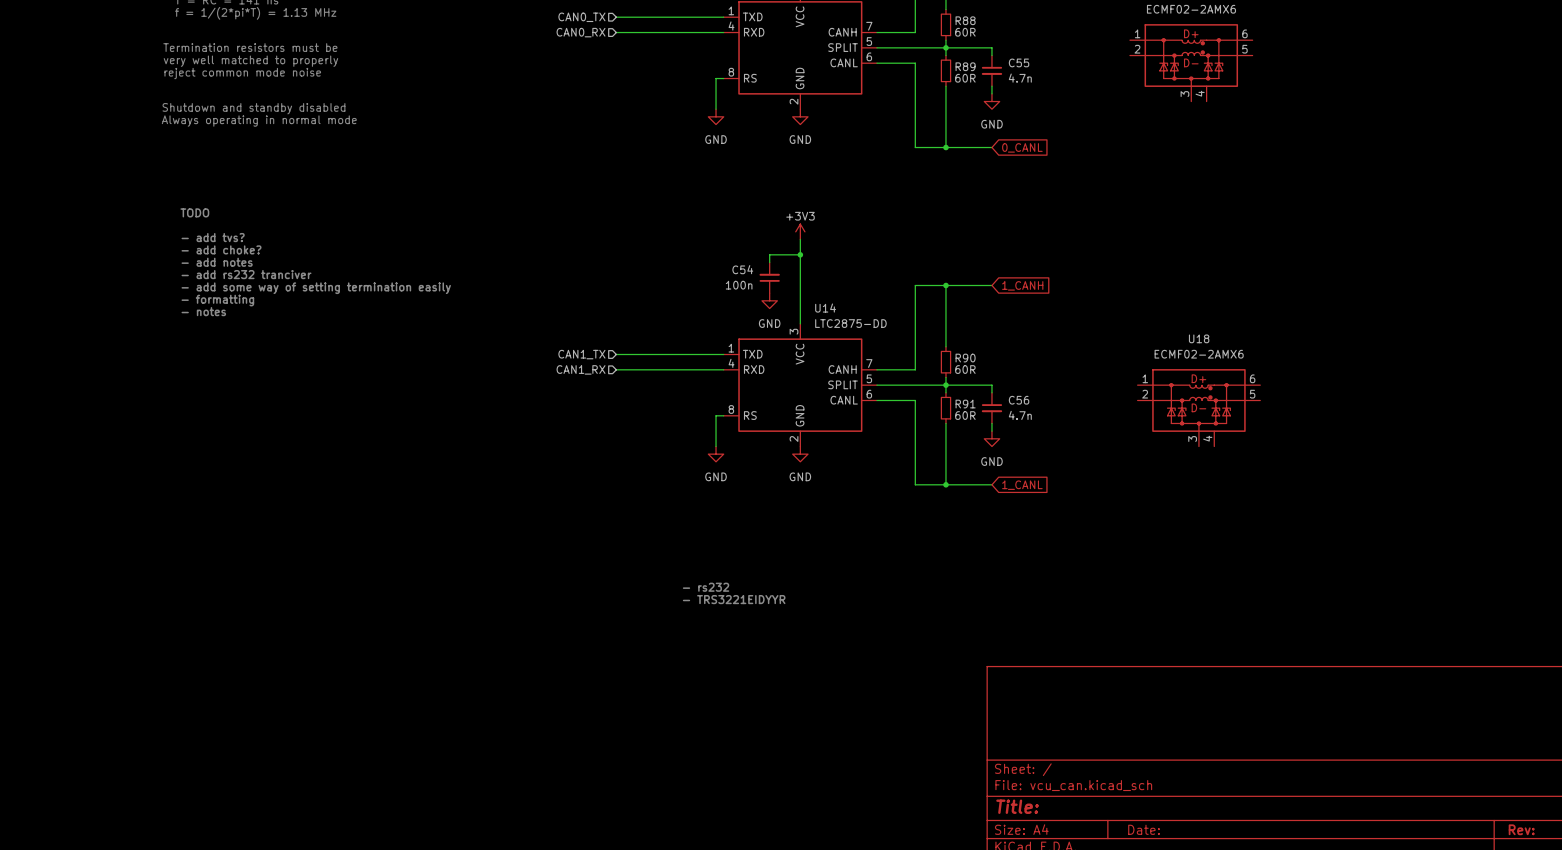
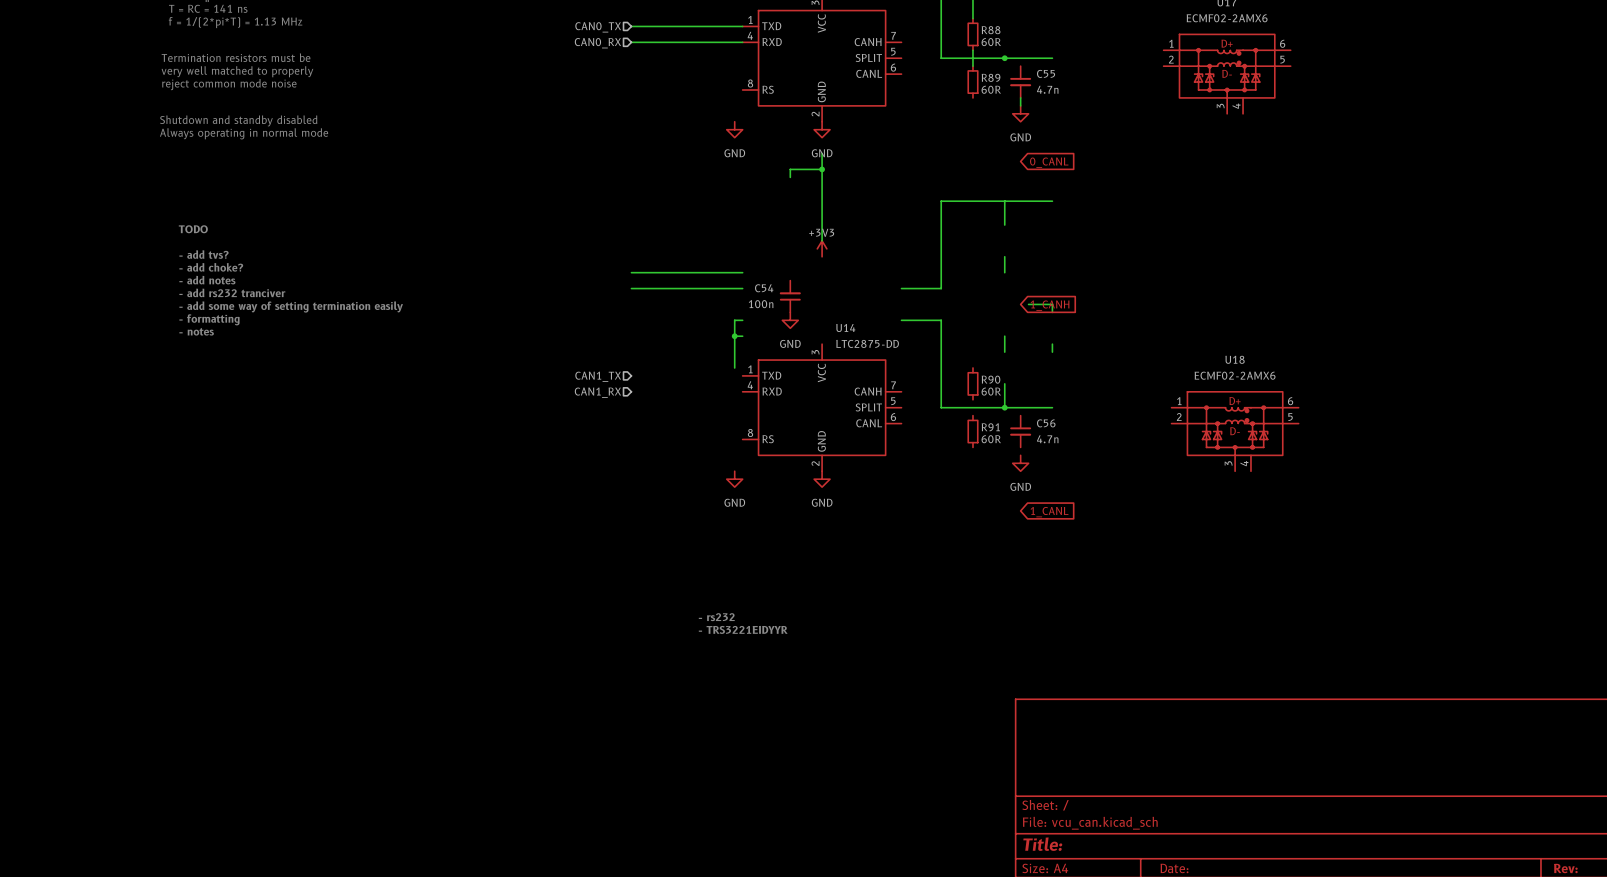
wire: (876, 32) (915, 32) -> (941, 58) (941, 42)
wire: (876, 47) (915, 47) -> none
junction position: (945, 47) -> (1004, 58)
wire: (991, 47) (991, 55) -> (1020, 58) (1052, 58)
wire: (876, 63) (915, 63) (915, 147) (991, 147) -> none
wire: (723, 78) (716, 78) (716, 109) -> none
wire: (945, 86) (945, 147) -> none
junction: (945, 147) -> none
junction: none -> (822, 169)
wire: none -> (1004, 201) (1004, 225)
wire: none -> (1052, 201) (941, 201) (941, 288) (901, 288)
wire: (800, 239) (800, 323) -> (822, 153) (822, 240)
wire: none -> (1004, 256) (1004, 272)
wire: (800, 254) (769, 254) (769, 262) -> (822, 169) (790, 169) (790, 177)
junction: (800, 254) -> none
wire: (945, 285) (945, 346) -> none
junction: (945, 285) -> none
wire: (991, 285) (915, 285) (915, 300) -> (901, 320) (941, 320)
wire: none -> (1028, 304) (1052, 304) (1052, 312)
wire: none -> (742, 320) (734, 320) (734, 367)
wire: none -> (734, 336) (742, 336)
junction: none -> (734, 336)
wire: (616, 354) (723, 354) -> (631, 272) (742, 272)
wire: none -> (1004, 383) (1004, 407)
wire: (616, 369) (723, 369) -> (631, 288) (742, 288)
wire: (876, 369) (915, 369) -> (941, 407) (941, 391)
wire: (945, 377) (945, 392) -> (1004, 336) (1004, 352)
wire: (876, 385) (915, 385) -> none
junction position: (945, 385) -> (1004, 407)
wire: (991, 385) (991, 392) -> (1020, 407) (1052, 407)
wire: (876, 400) (915, 400) (915, 484) (991, 484) -> none
wire: (723, 415) (716, 415) (716, 446) -> none
wire: (945, 423) (945, 484) -> none
wire: (991, 423) (991, 431) -> (1052, 344) (1052, 352)
junction: (945, 484) -> none

